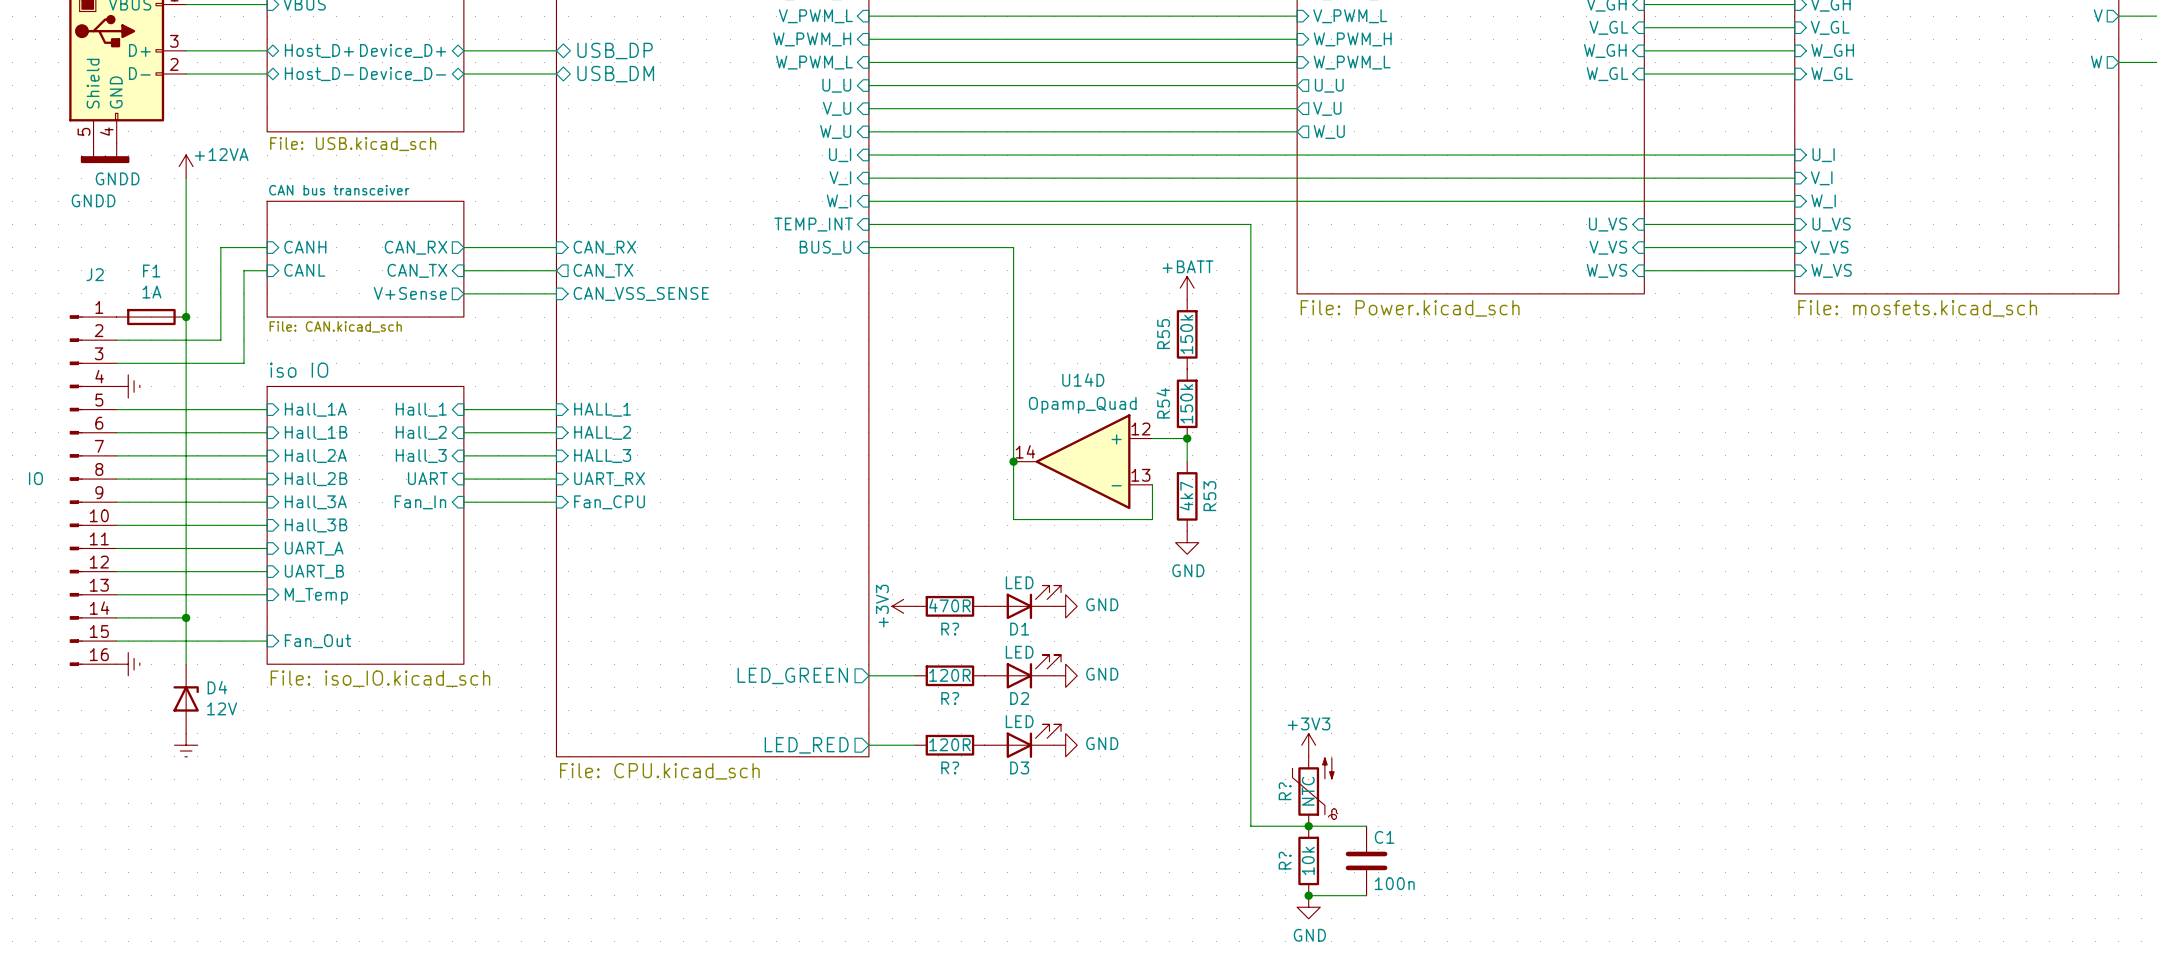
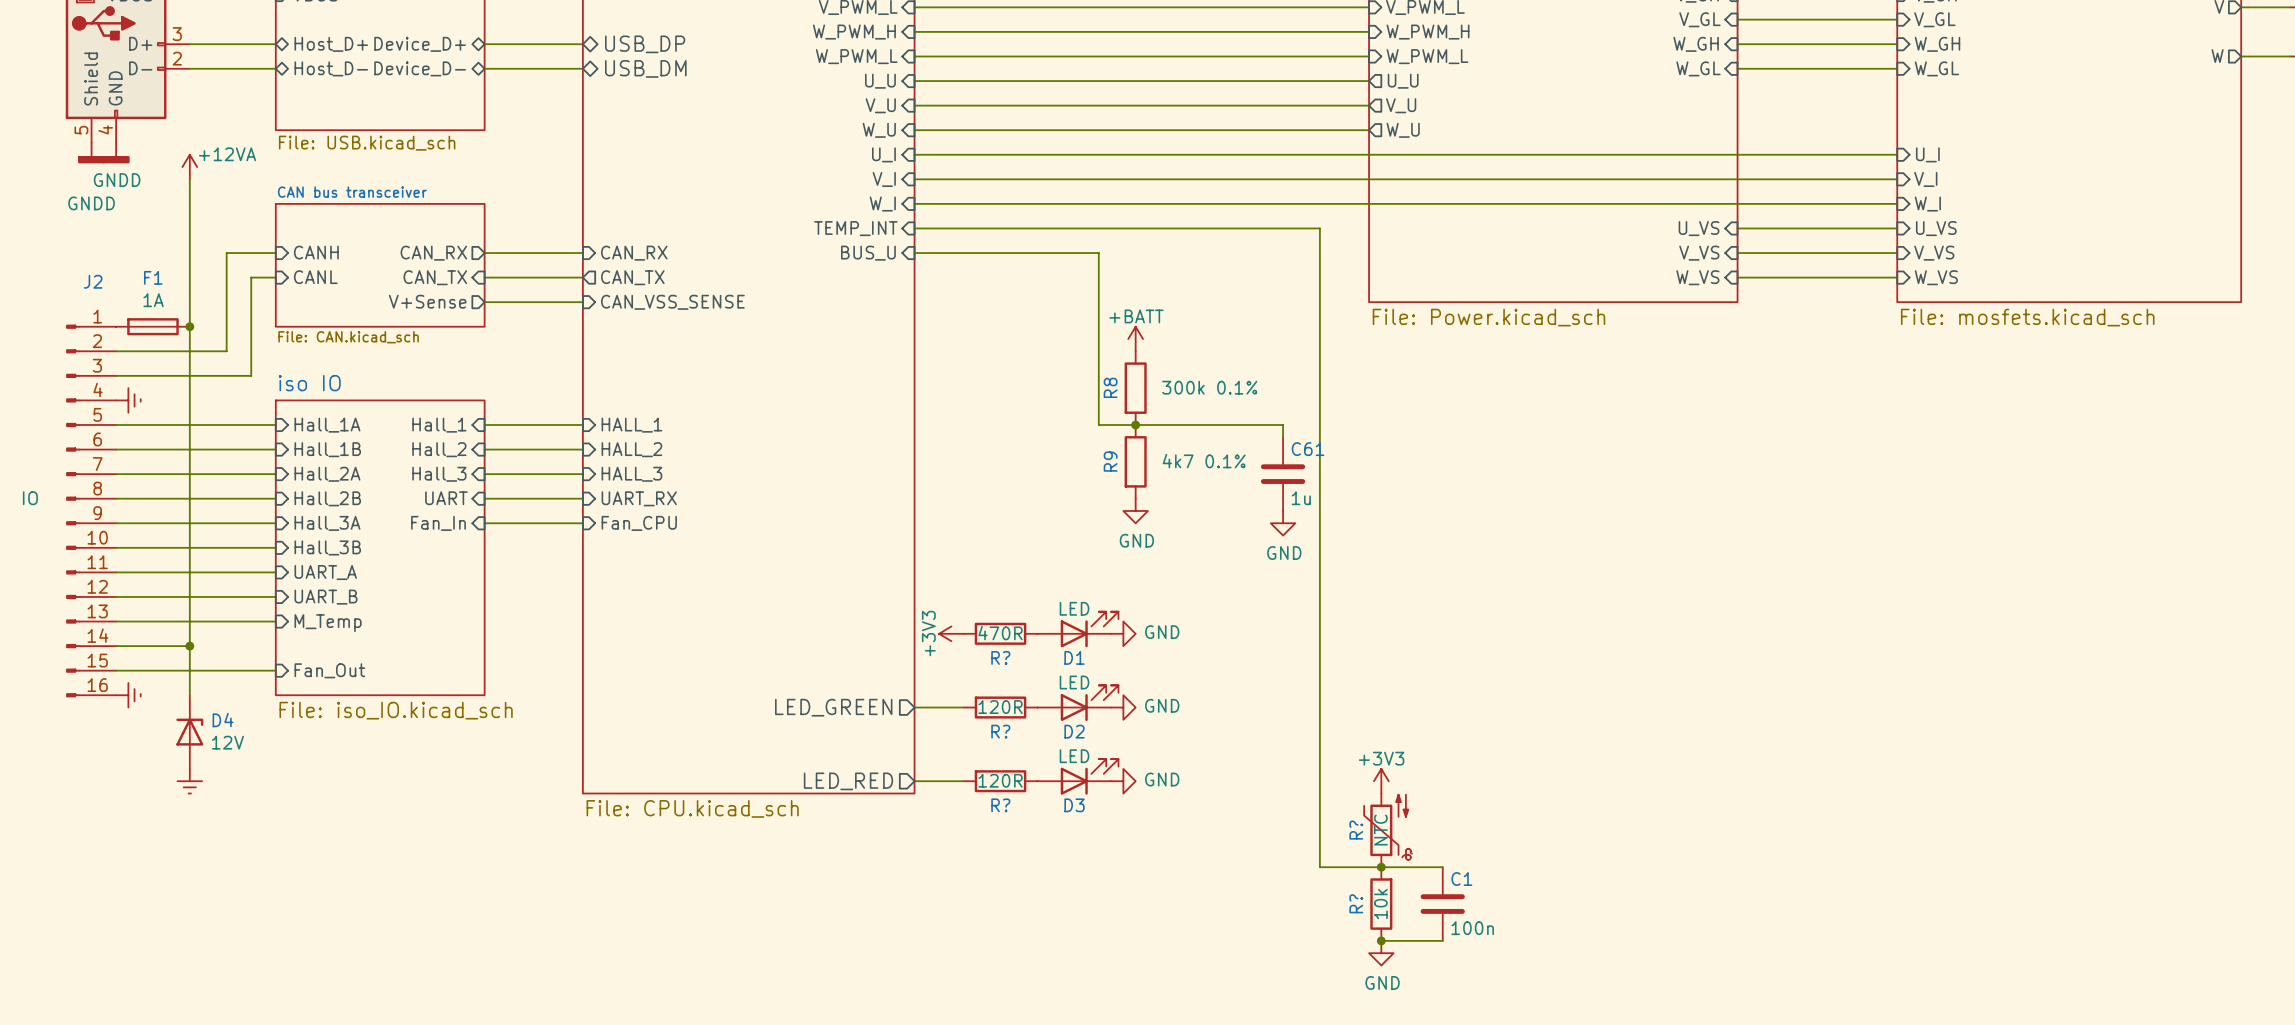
wire: (1013, 247) (1013, 519) (1152, 519) (1152, 484) -> (1068, 253) (1098, 253) (1098, 425) (1283, 425) (1283, 437)
power symbol position: +BATT (1187, 288) -> +BATT (1135, 339)
R55: 150k (1187, 334) -> none
R8: none -> 300k 0.1% (1135, 388)
R54: 150k (1187, 403) -> none
junction: none -> (1135, 425)
wire: (1152, 438) (1187, 438) (1187, 461) -> none
junction: (1187, 438) -> none
R9: none -> 4k7 0.1% (1135, 461)
C61: none -> 1u (1283, 474)
junction: (1013, 461) -> none
U14D: Opamp_Quad (1083, 461) -> none
power symbol: none -> GND (1135, 510)
R53: 4k7 (1187, 496) -> none
power symbol position: GND (1187, 542) -> GND (1283, 523)

